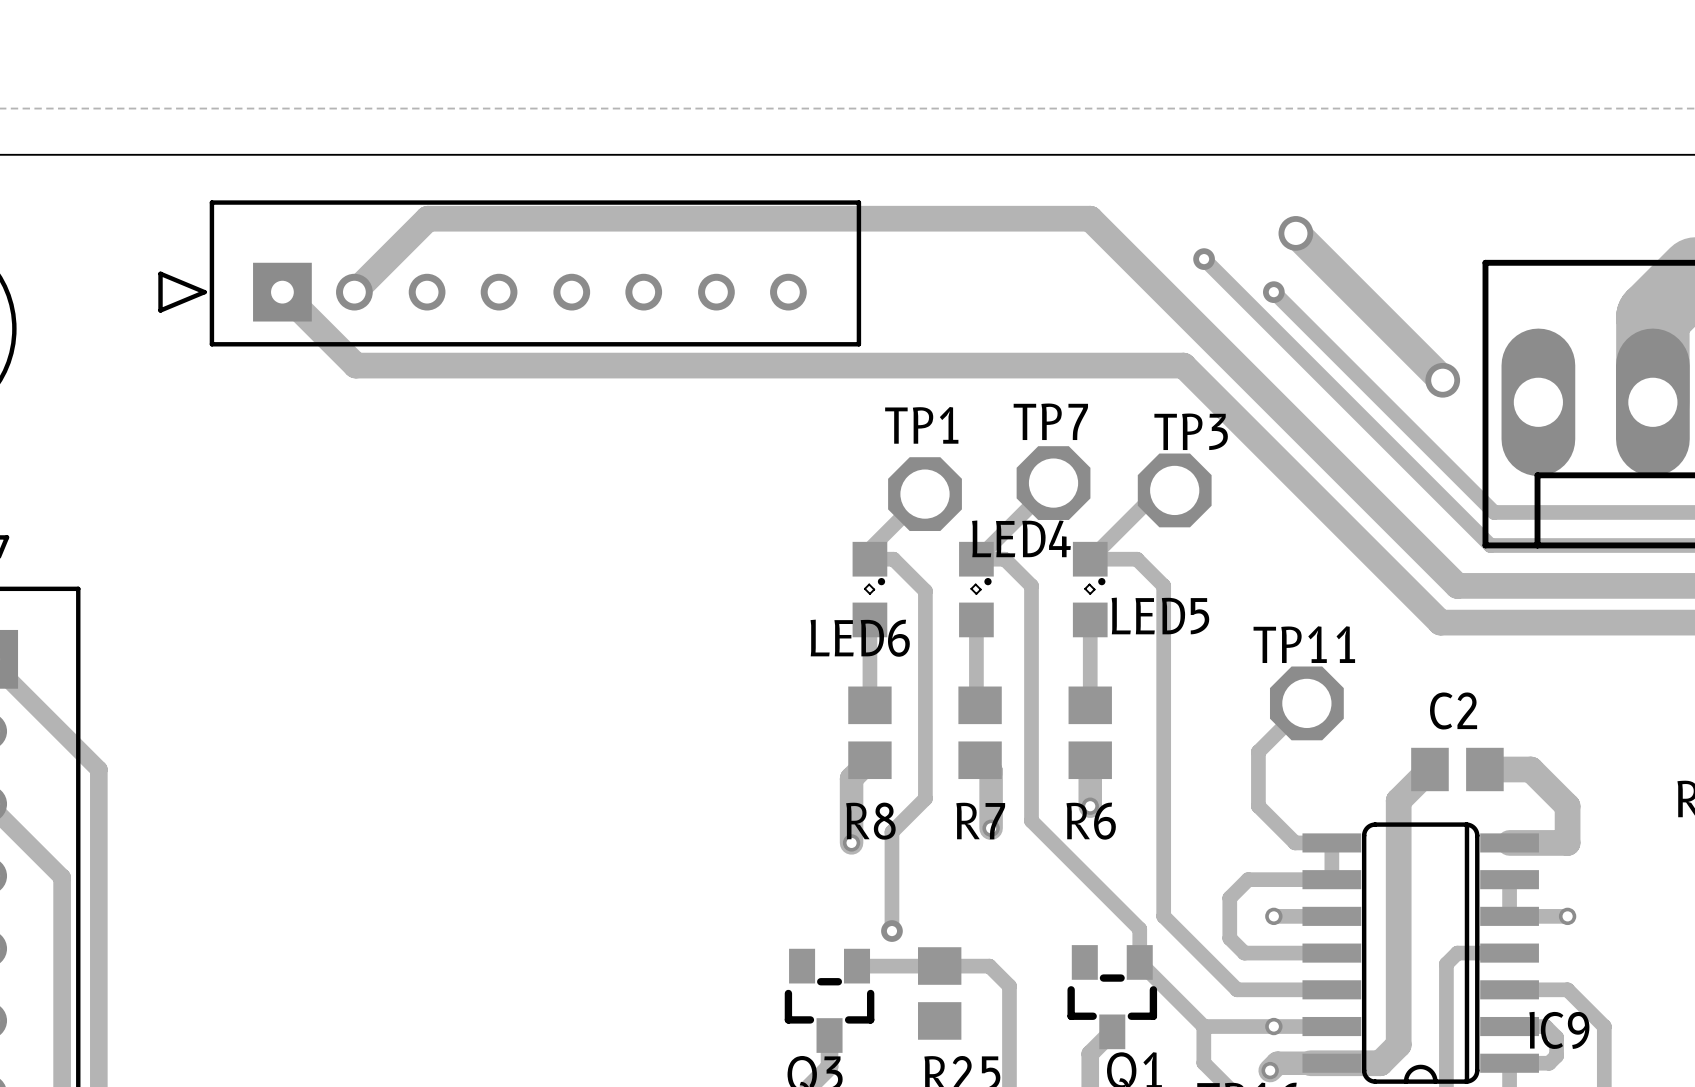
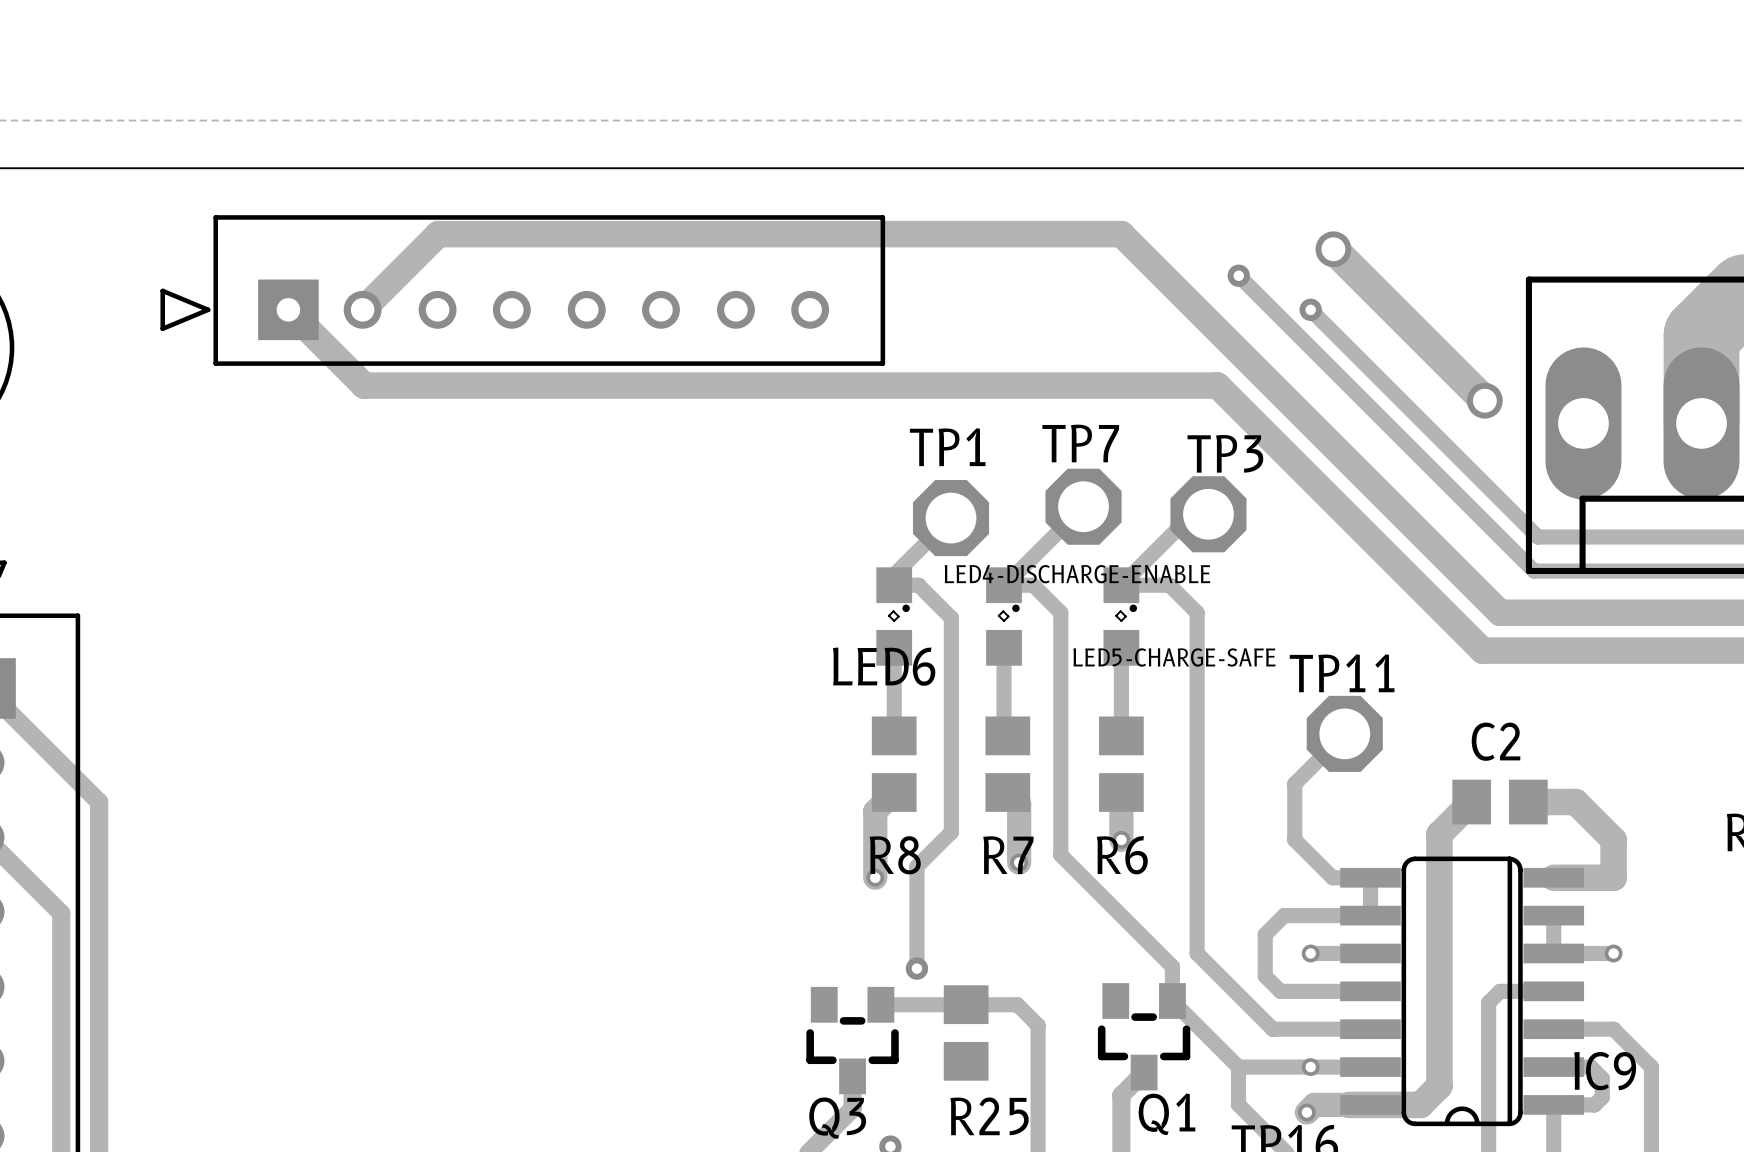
LED4 name: LED4 (1021, 538) -> LED4-DISCHARGE-ENABLE (1077, 574)
LED5 name: LED5 (1160, 615) -> LED5-CHARGE-SAFE (1174, 657)

